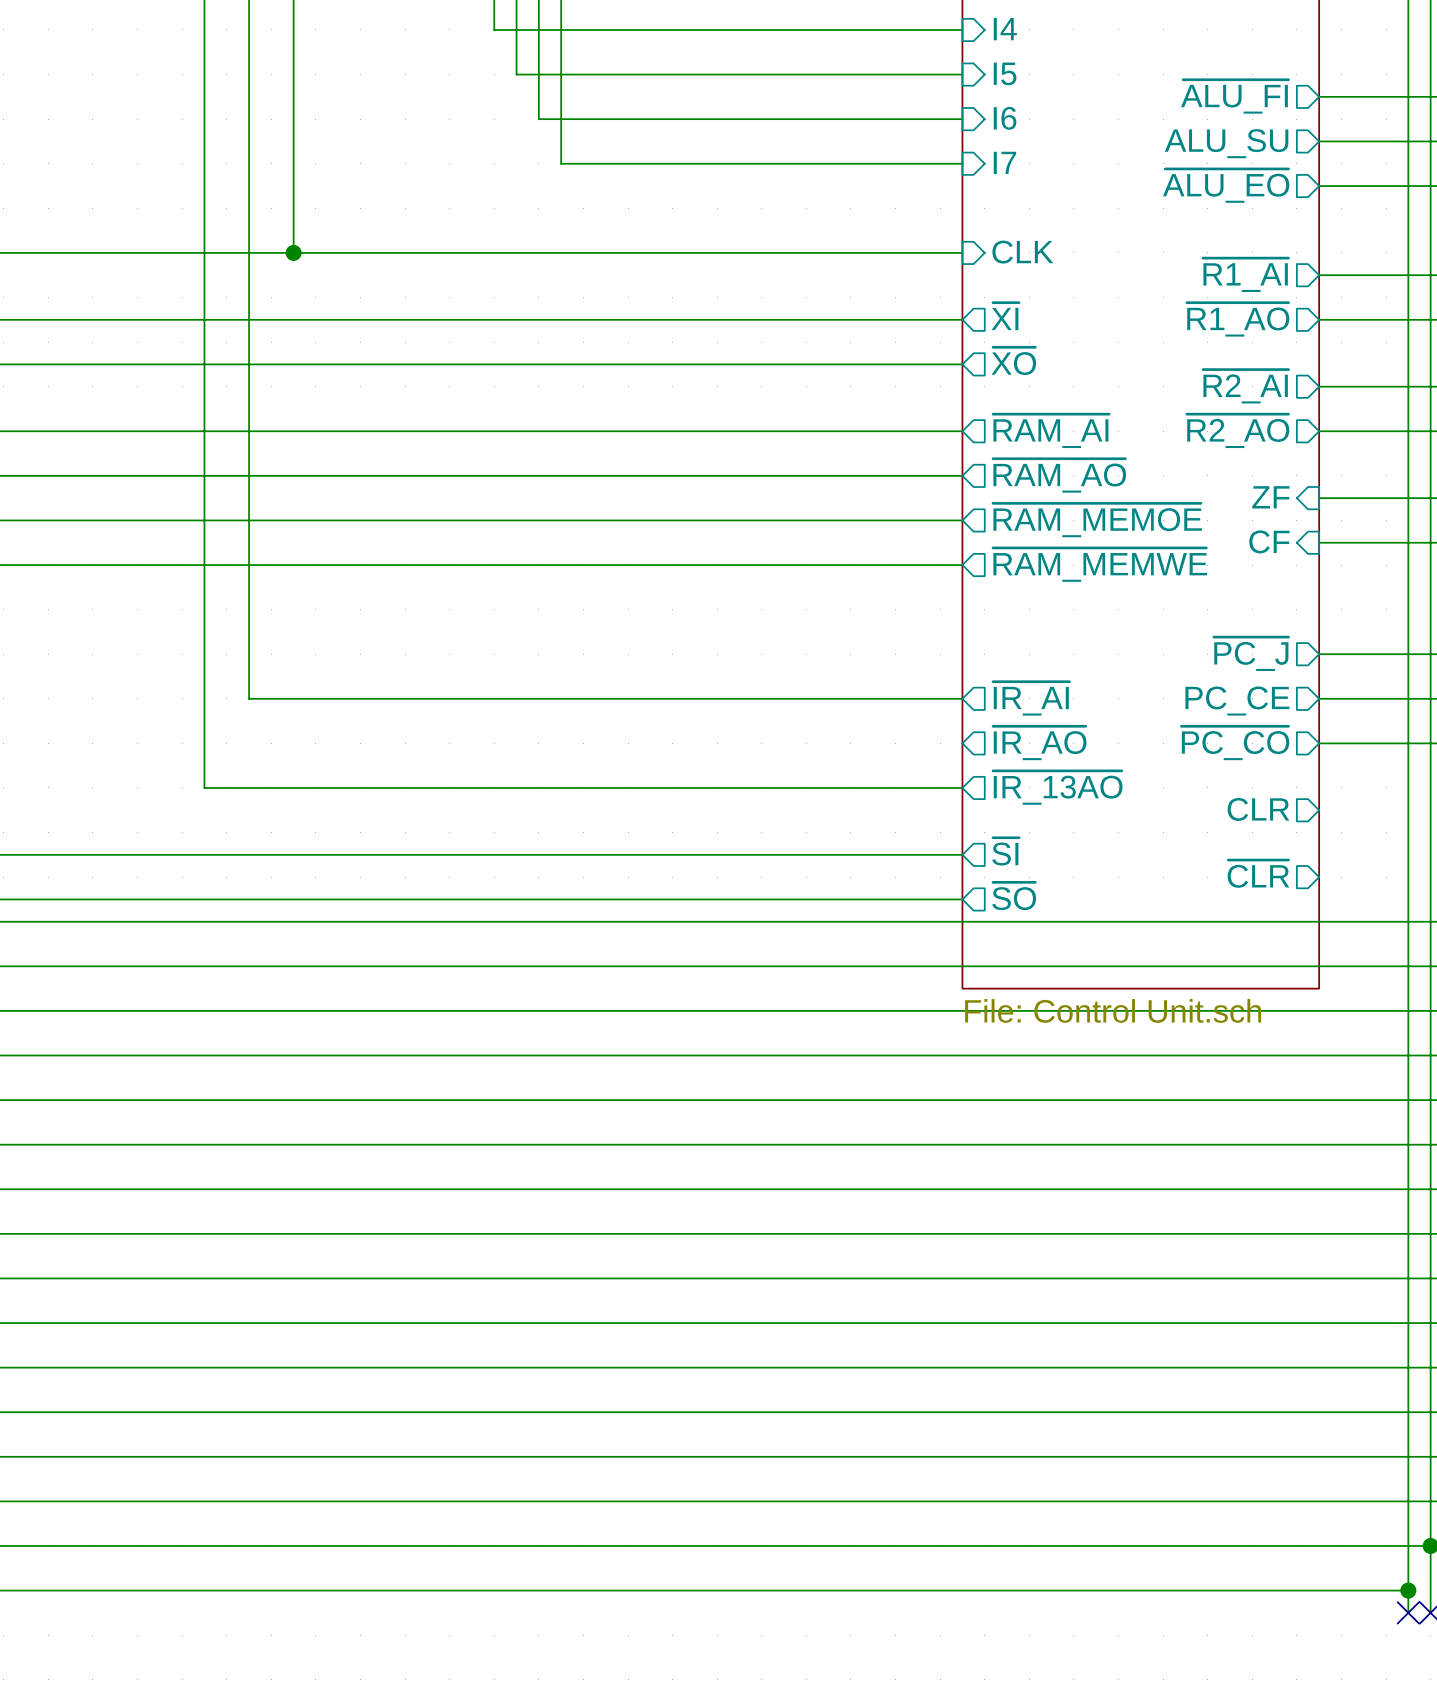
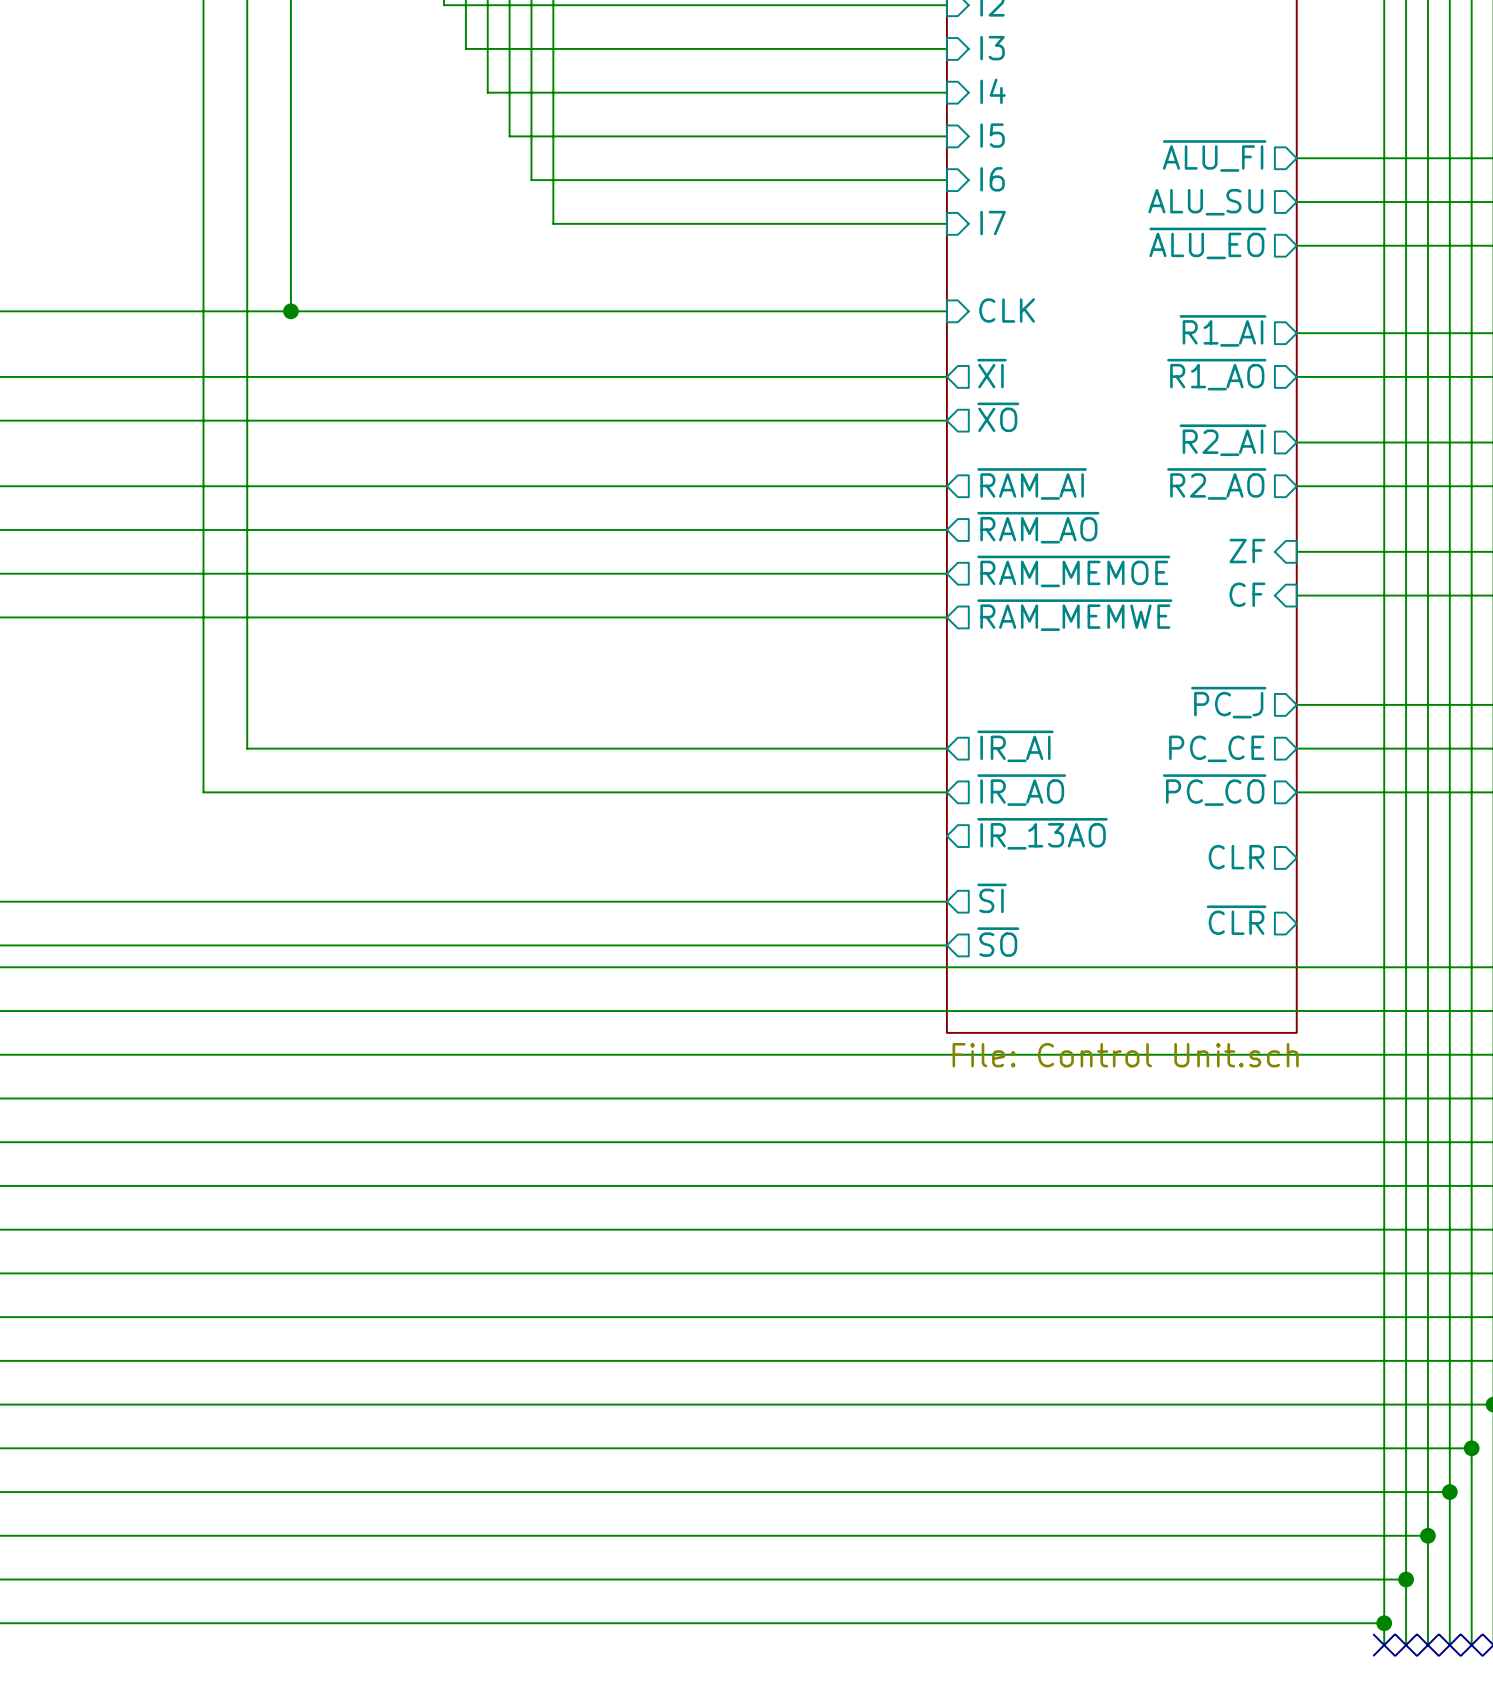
wire: (204, 743) (204, 787) (962, 787) -> (203, 792) (946, 792)

